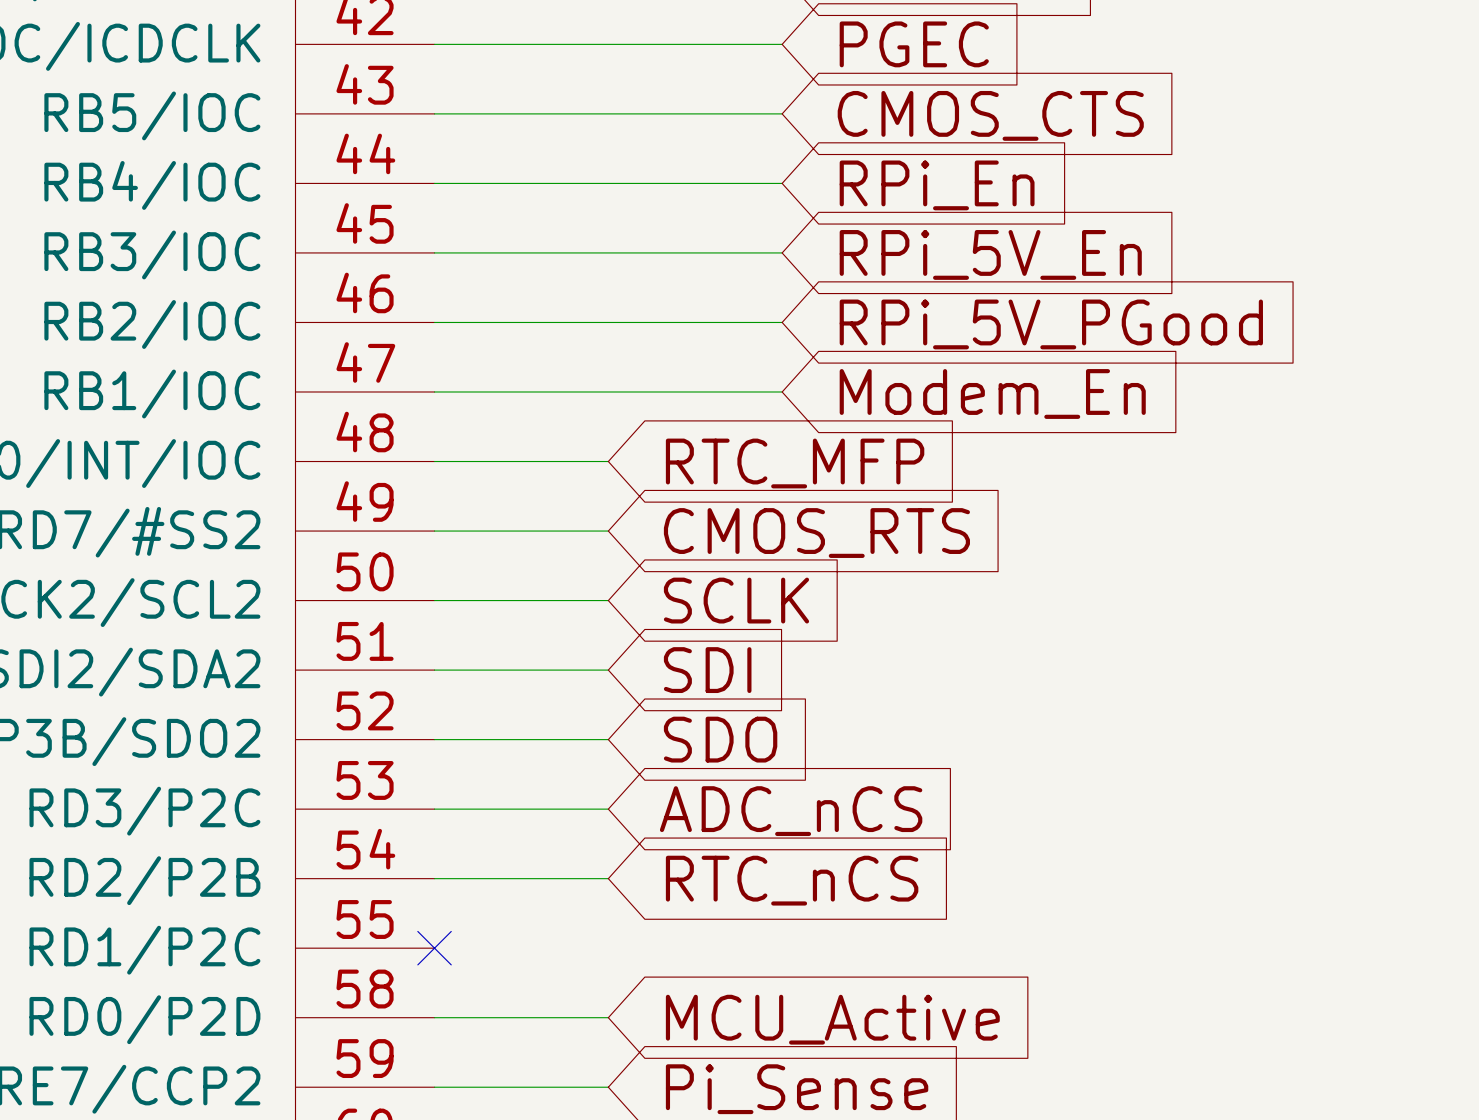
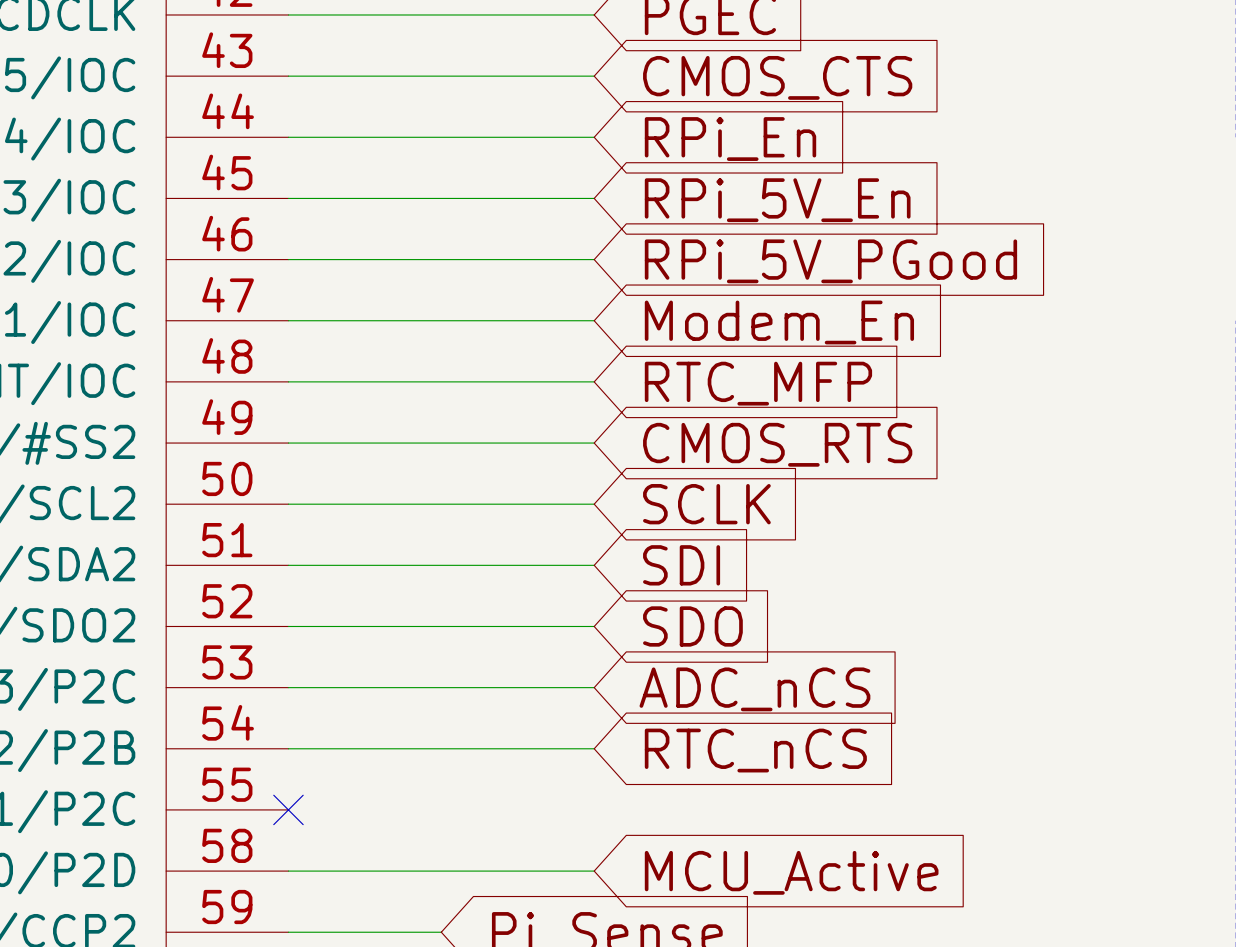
wire: none -> (441, 381) (594, 381)
global label position: RTC_MFP (795, 463) -> RTC_MFP (758, 383)
wire: none -> (441, 443) (594, 443)
global label position: CMOS_RTS (816, 533) -> CMOS_RTS (777, 444)
wire: none -> (441, 504) (594, 504)
global label position: SCLK (736, 600) -> SCLK (706, 504)
wire: none -> (441, 565) (594, 565)
global label position: SDI (707, 670) -> SDI (681, 565)
wire: none -> (441, 626) (594, 626)
global label position: SDO (720, 739) -> SDO (692, 626)
wire: none -> (441, 687) (594, 687)
global label position: ADC_nCS (791, 811) -> ADC_nCS (754, 689)
wire: none -> (441, 748) (594, 748)
global label position: RTC_nCS (792, 880) -> RTC_nCS (755, 750)
wire: none -> (441, 871) (594, 871)
global label position: MCU_Active (832, 1019) -> MCU_Active (791, 872)

